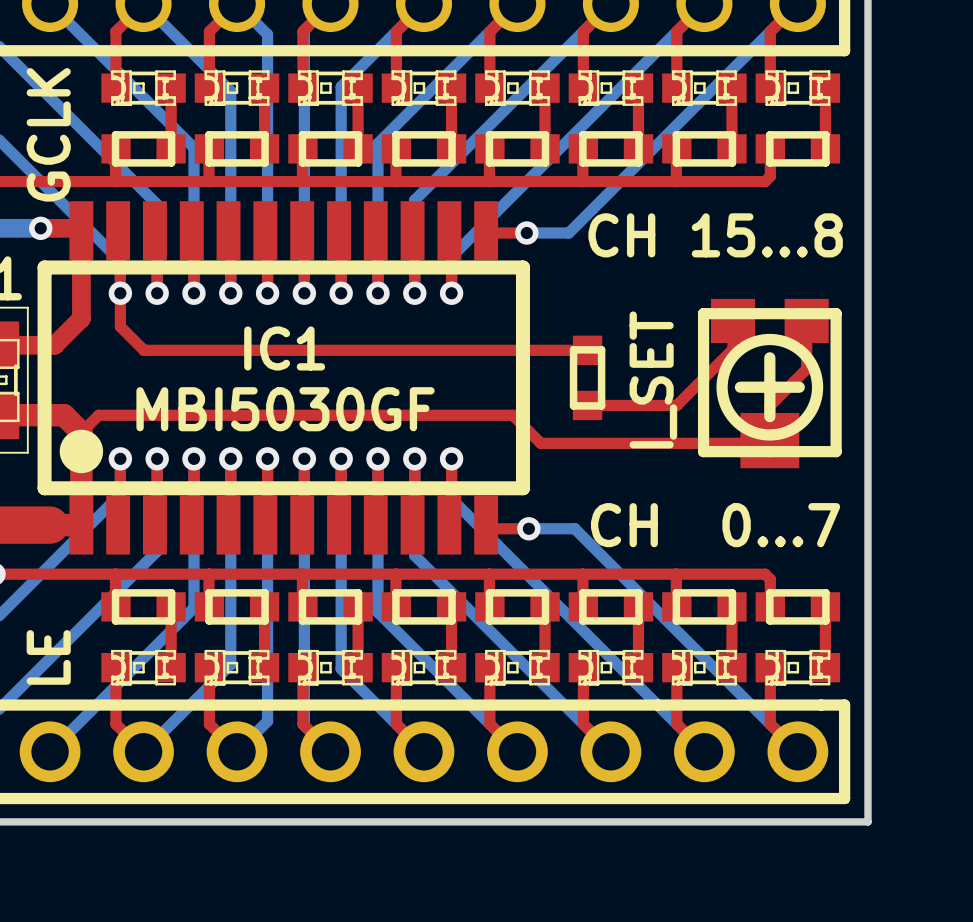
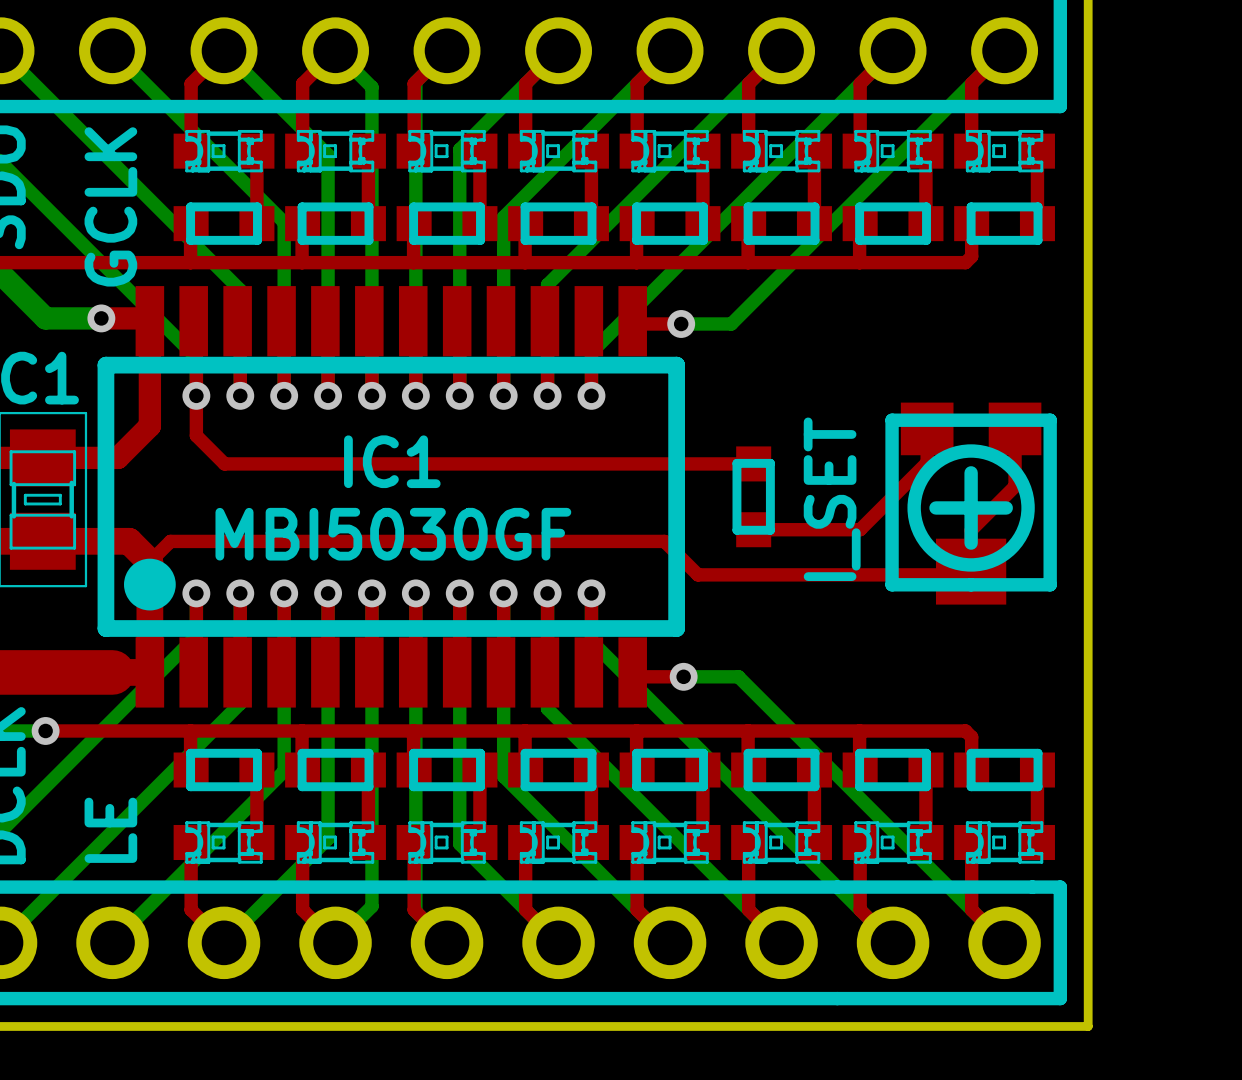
text: CH 15...8 (715, 235) -> none
text: CH 0...7 (715, 525) -> none

